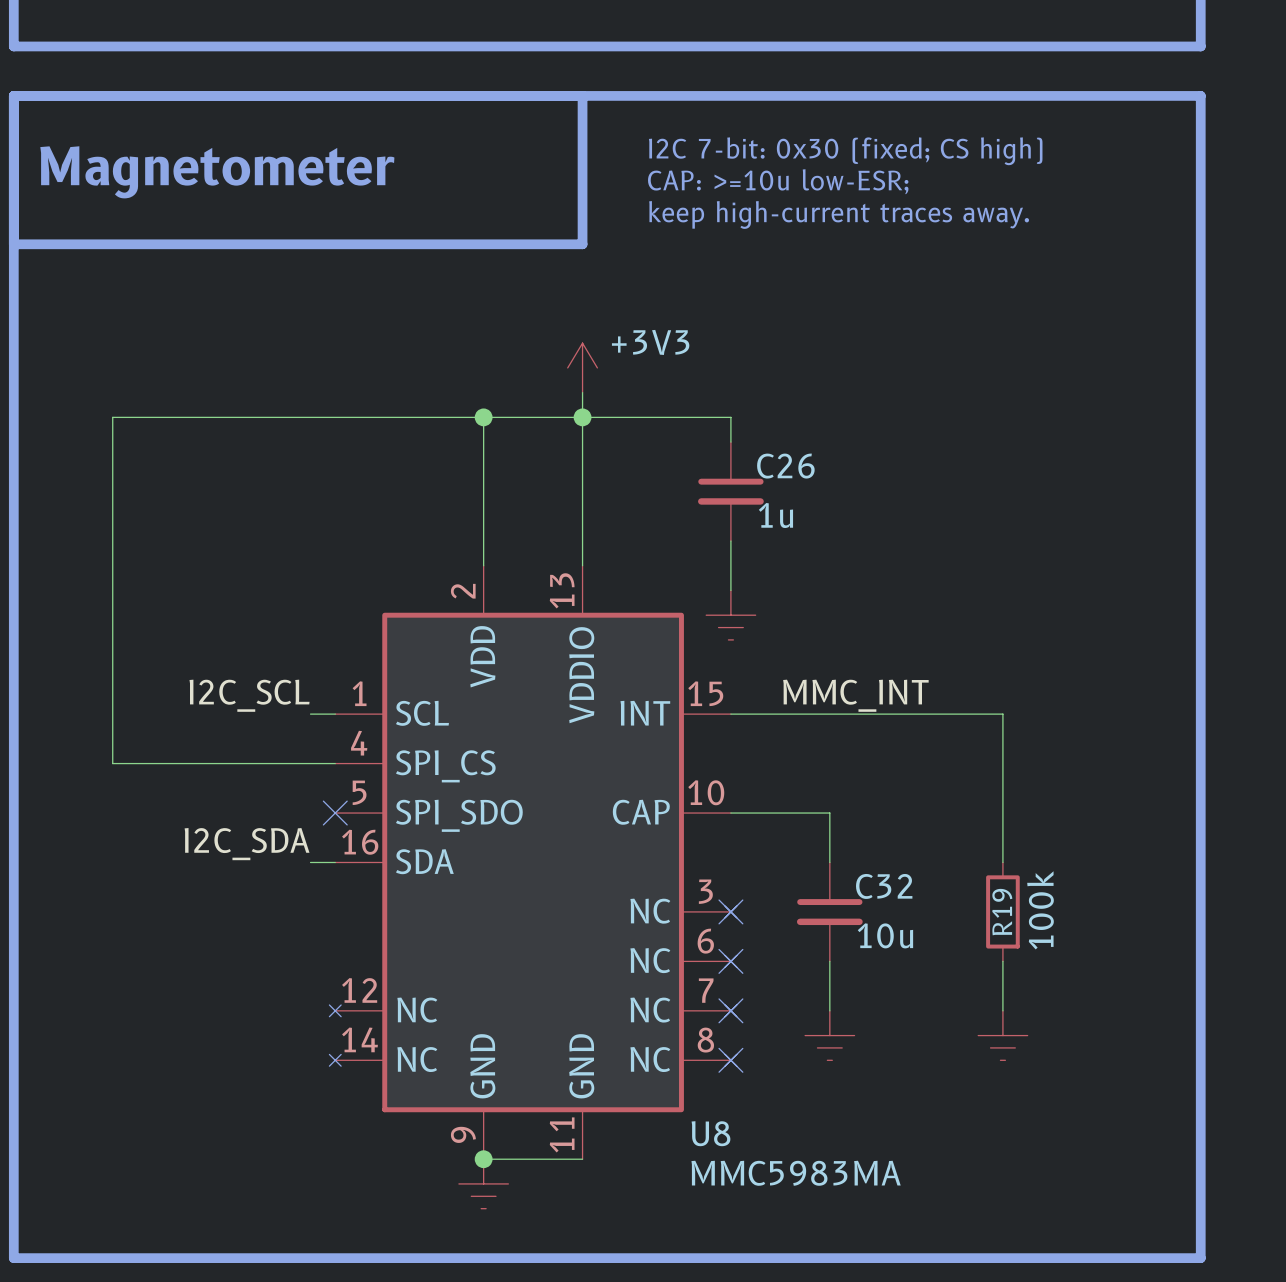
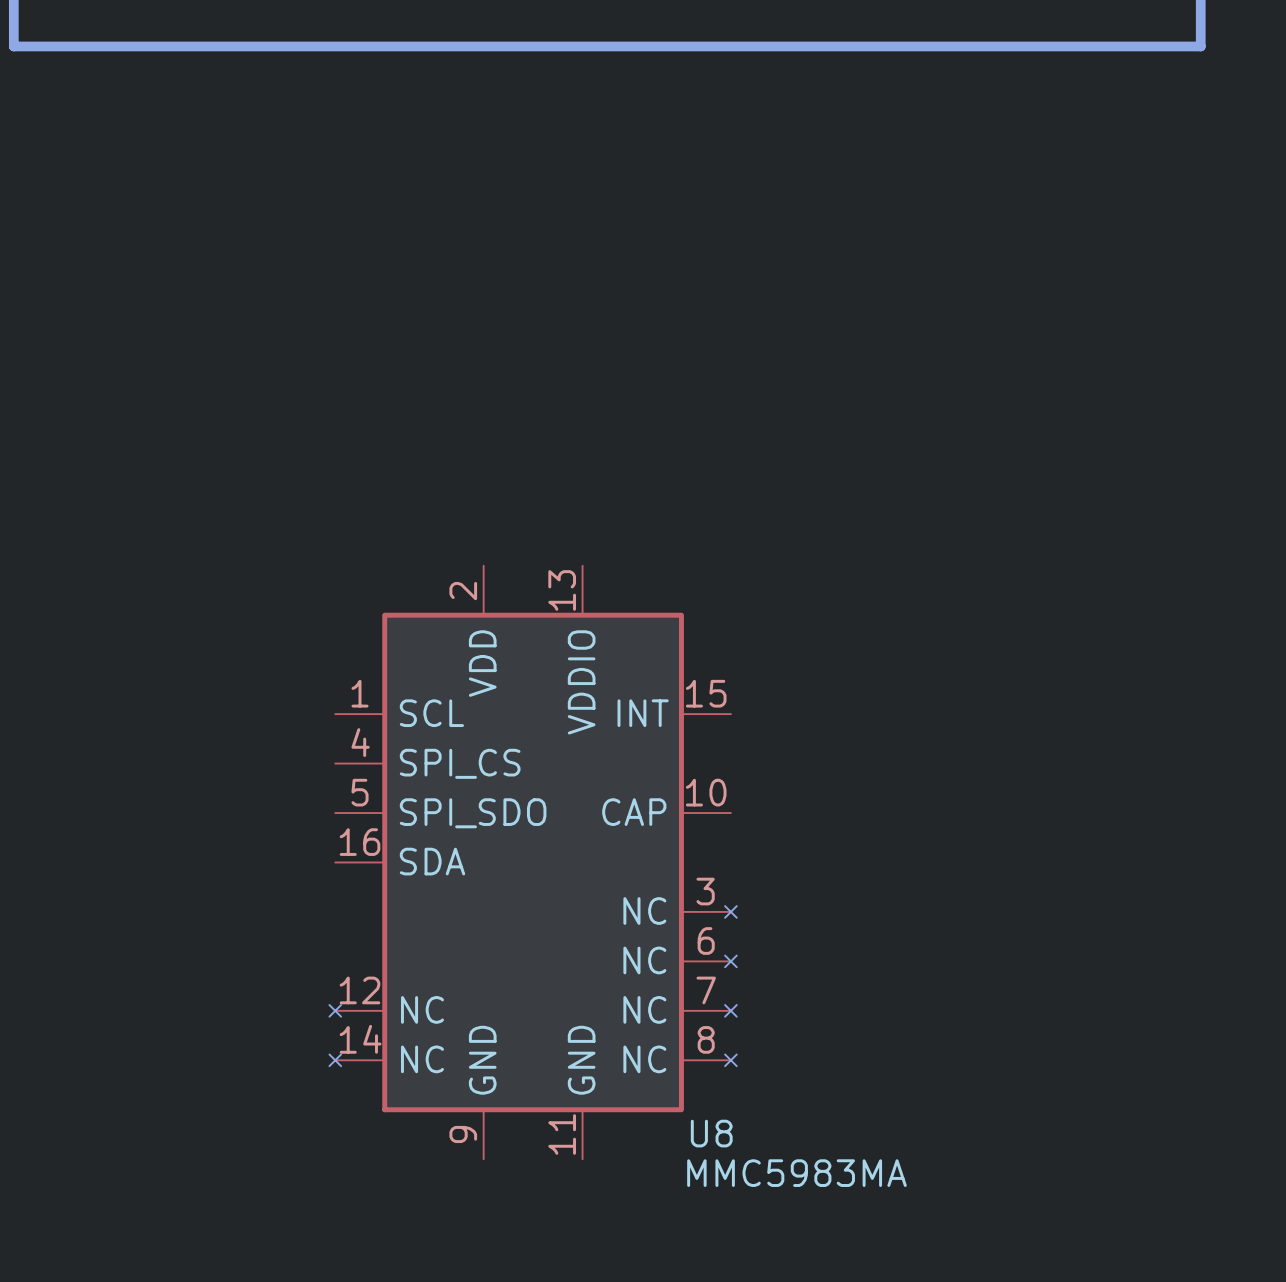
line: (13, 95) (13, 1258) (1200, 1258) (1200, 95) (13, 95) -> none
line: (582, 95) (582, 244) (13, 244) -> none
text: I2C 7-bit: 0x30 (fixed; CS high) (845, 151) -> none
text: Magnetometer (217, 172) -> none
text: CAP: >=10u low-ESR; (778, 181) -> none
text: keep high-current traces away. (839, 214) -> none
power symbol: +3V3 (582, 367) -> none
wire: (582, 392) (582, 565) -> none
wire: (483, 417) (483, 565) -> none
junction: (483, 417) -> none
junction: (582, 417) -> none
wire: (730, 442) (730, 417) (112, 417) (112, 763) (335, 763) -> none
C26: 1u (730, 491) -> none
wire: (730, 541) (730, 590) -> none
power symbol: (730, 615) -> none
label: I2C_SCL (249, 695) -> none
label: MMC_INT (855, 695) -> none
wire: (310, 714) (335, 714) -> none
wire: (730, 714) (1002, 714) (1002, 862) -> none
no-connect mark: (335, 813) -> none
wire: (730, 813) (829, 813) (829, 862) -> none
label: I2C_SDA (247, 844) -> none
wire: (310, 862) (335, 862) -> none
no-connect mark: (730, 911) -> none
C32: 10u (829, 911) -> none
R19: 100k (1002, 911) -> none
no-connect mark: (730, 961) -> none
wire: (829, 961) (829, 1010) -> none
wire: (1002, 961) (1002, 1010) -> none
no-connect mark: (730, 1010) -> none
power symbol: (829, 1035) -> none
power symbol: (1002, 1035) -> none
no-connect mark: (730, 1060) -> none
wire: (483, 1159) (582, 1159) -> none
junction: (483, 1159) -> none
power symbol: (483, 1183) -> none

